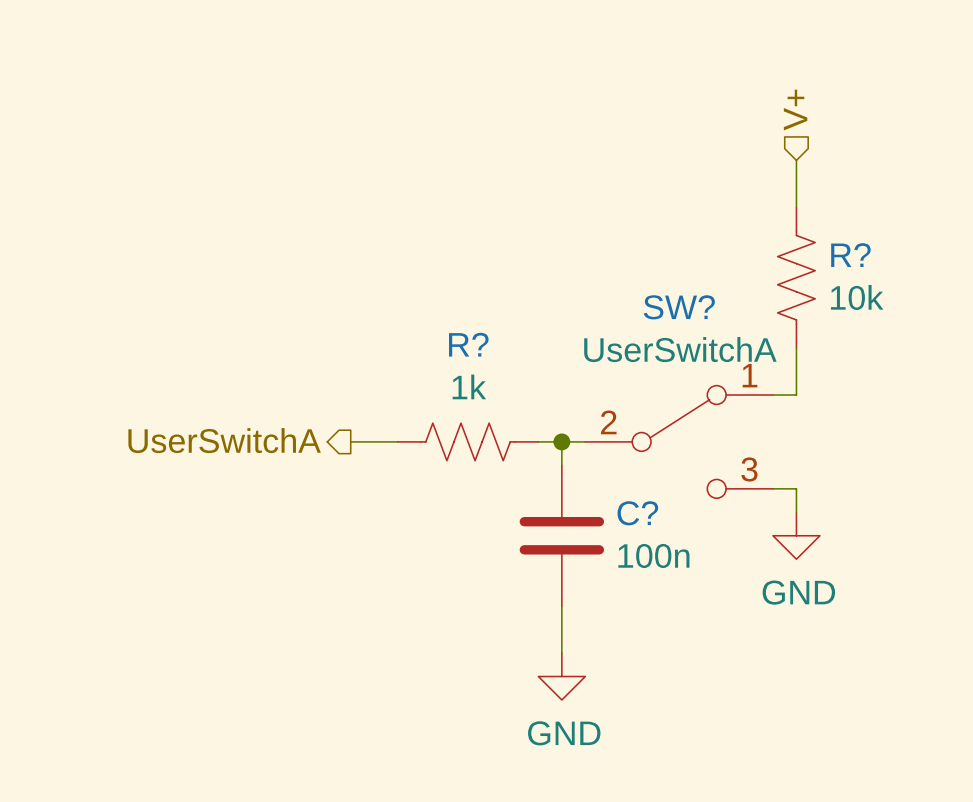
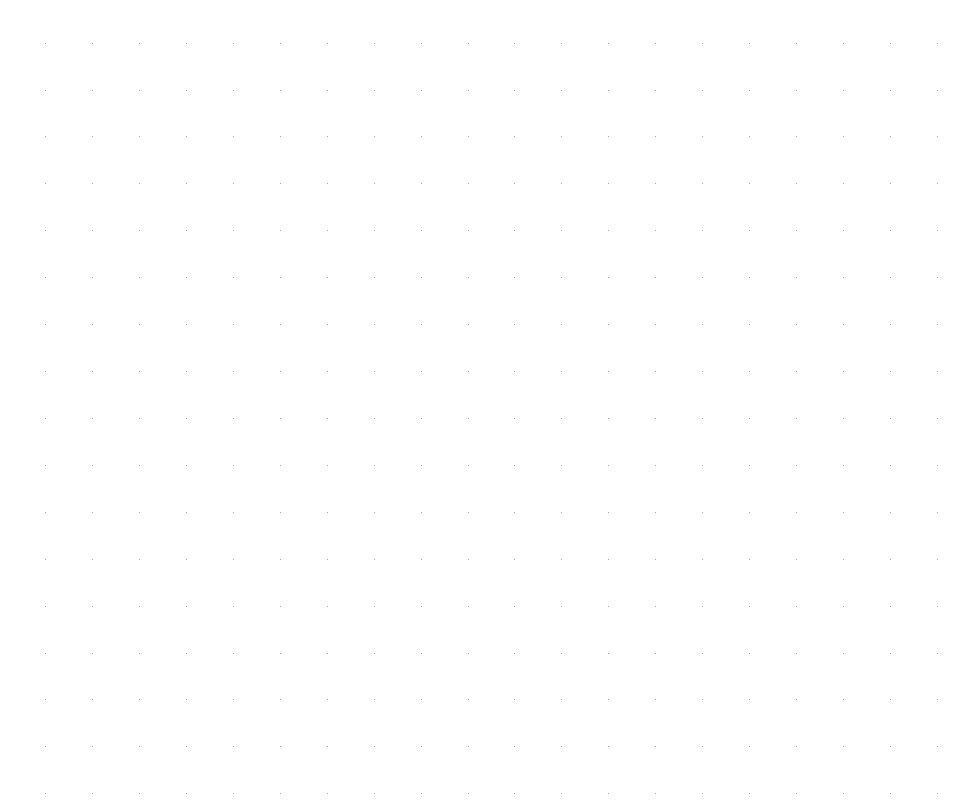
hierarchical label: V+ (795, 110) -> none
wire: (796, 160) (796, 207) -> none
R?: 10k (796, 277) -> none
wire: (796, 348) (796, 395) (772, 395) -> none
hierarchical label: UserSwitchA (224, 440) -> none
wire: (350, 441) (397, 441) -> none
R?: 1k (468, 441) -> none
wire: (538, 441) (585, 441) -> none
wire: (561, 441) (561, 465) -> none
junction: (561, 441) -> none
SW?: UserSwitchA (679, 441) -> none
wire: (772, 488) (796, 488) (796, 512) -> none
C?: 100n (561, 535) -> none
power symbol: GND (796, 535) -> none
wire: (561, 606) (561, 653) -> none
power symbol: GND (561, 676) -> none

